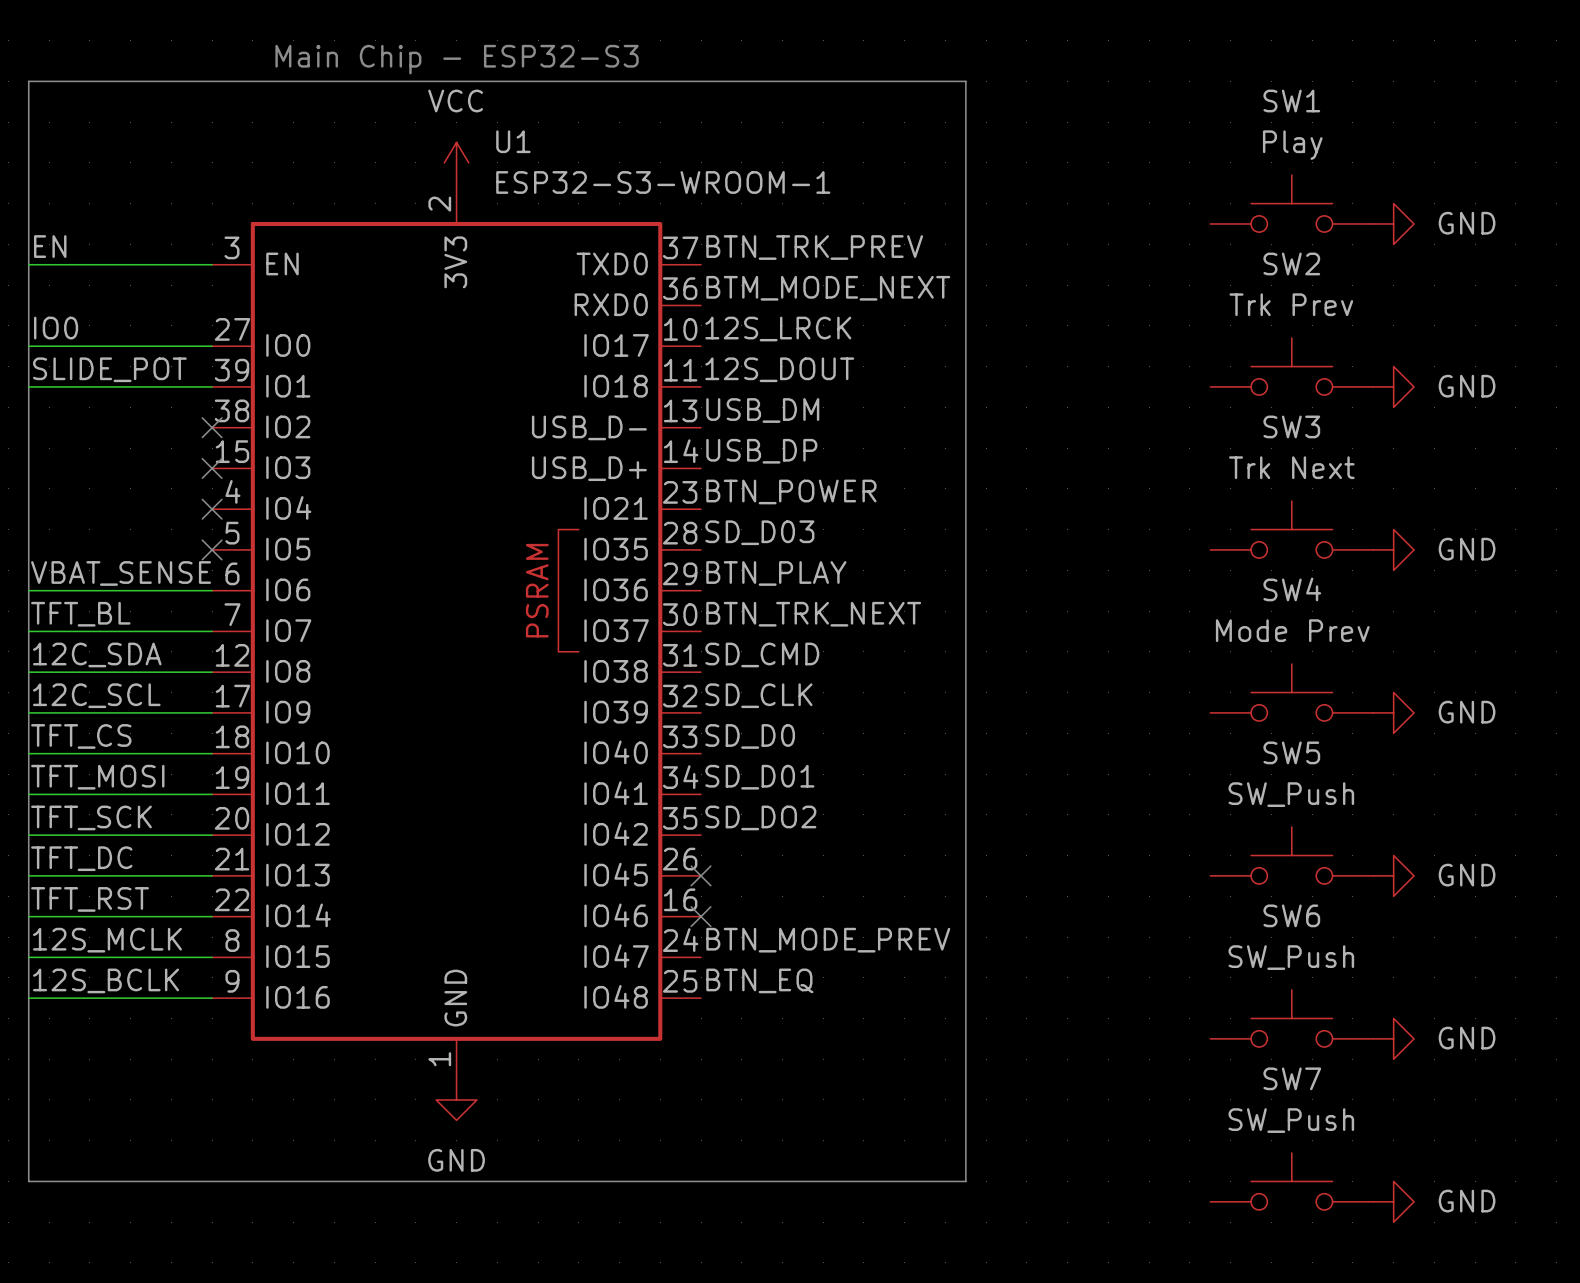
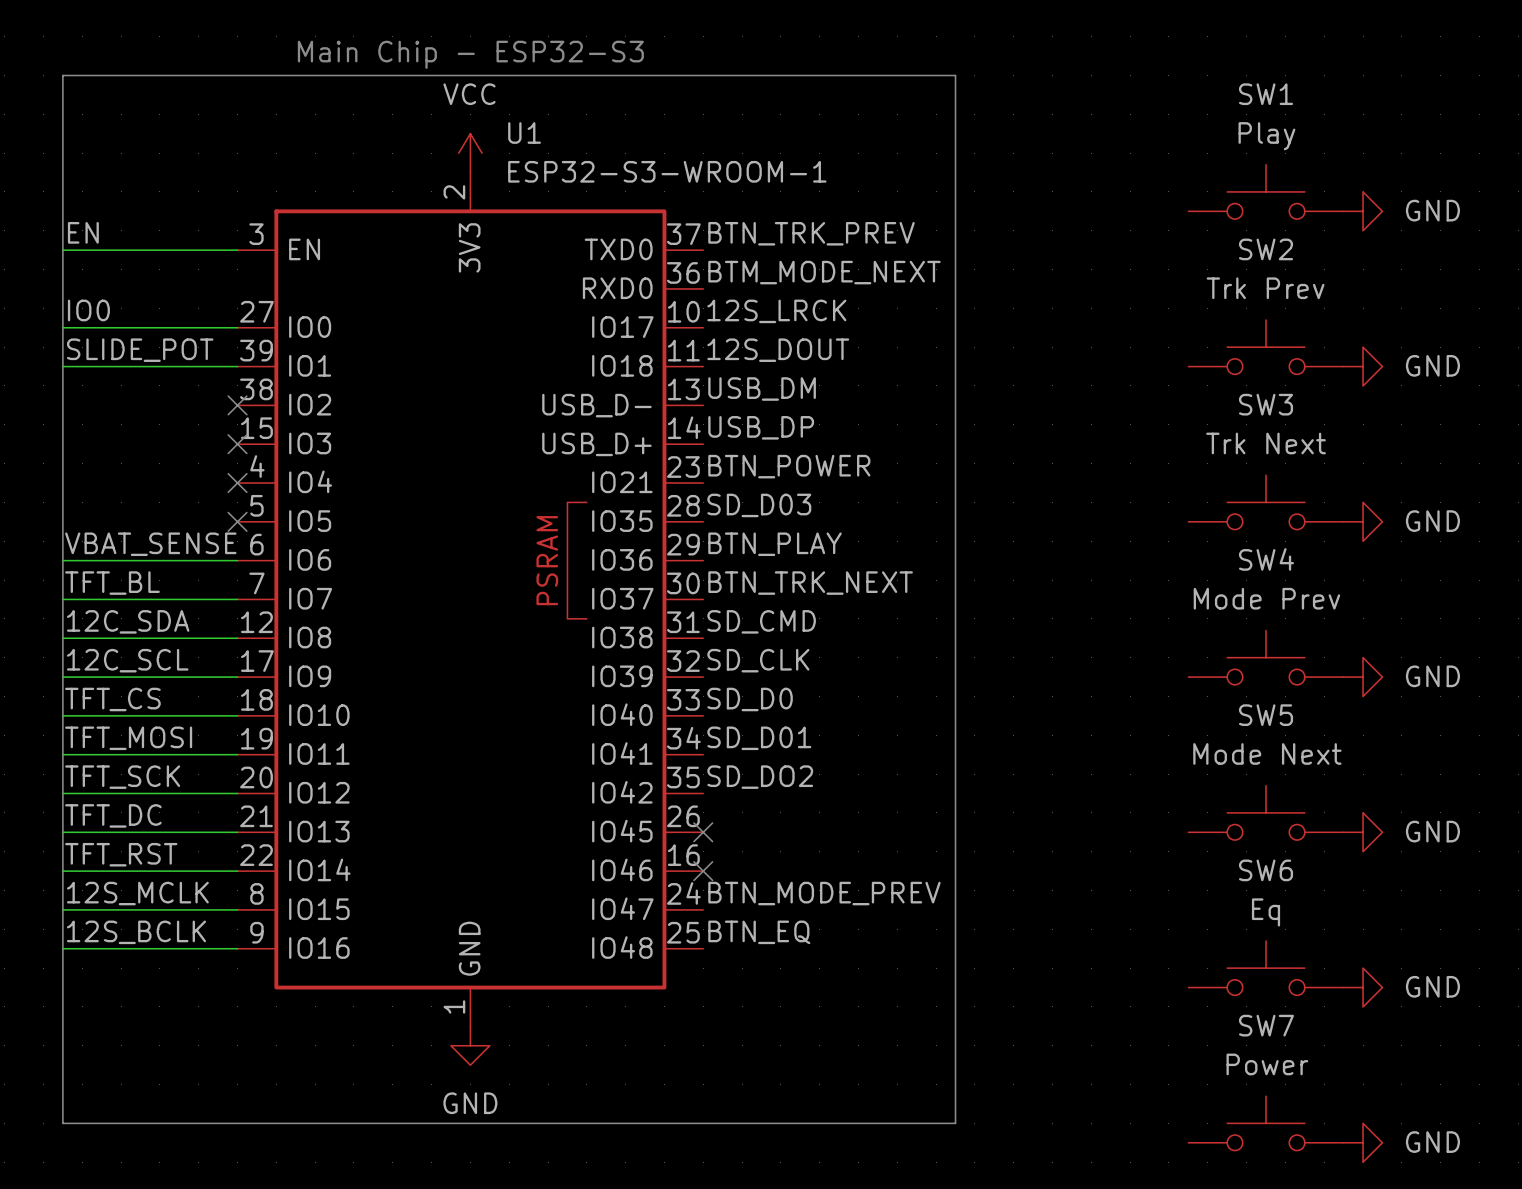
SW5 value: SW_Push (1291, 794) -> Mode Next (1267, 753)
SW6 value: SW_Push (1291, 957) -> Eq (1266, 912)
SW7 value: SW_Push (1291, 1120) -> Power (1267, 1064)

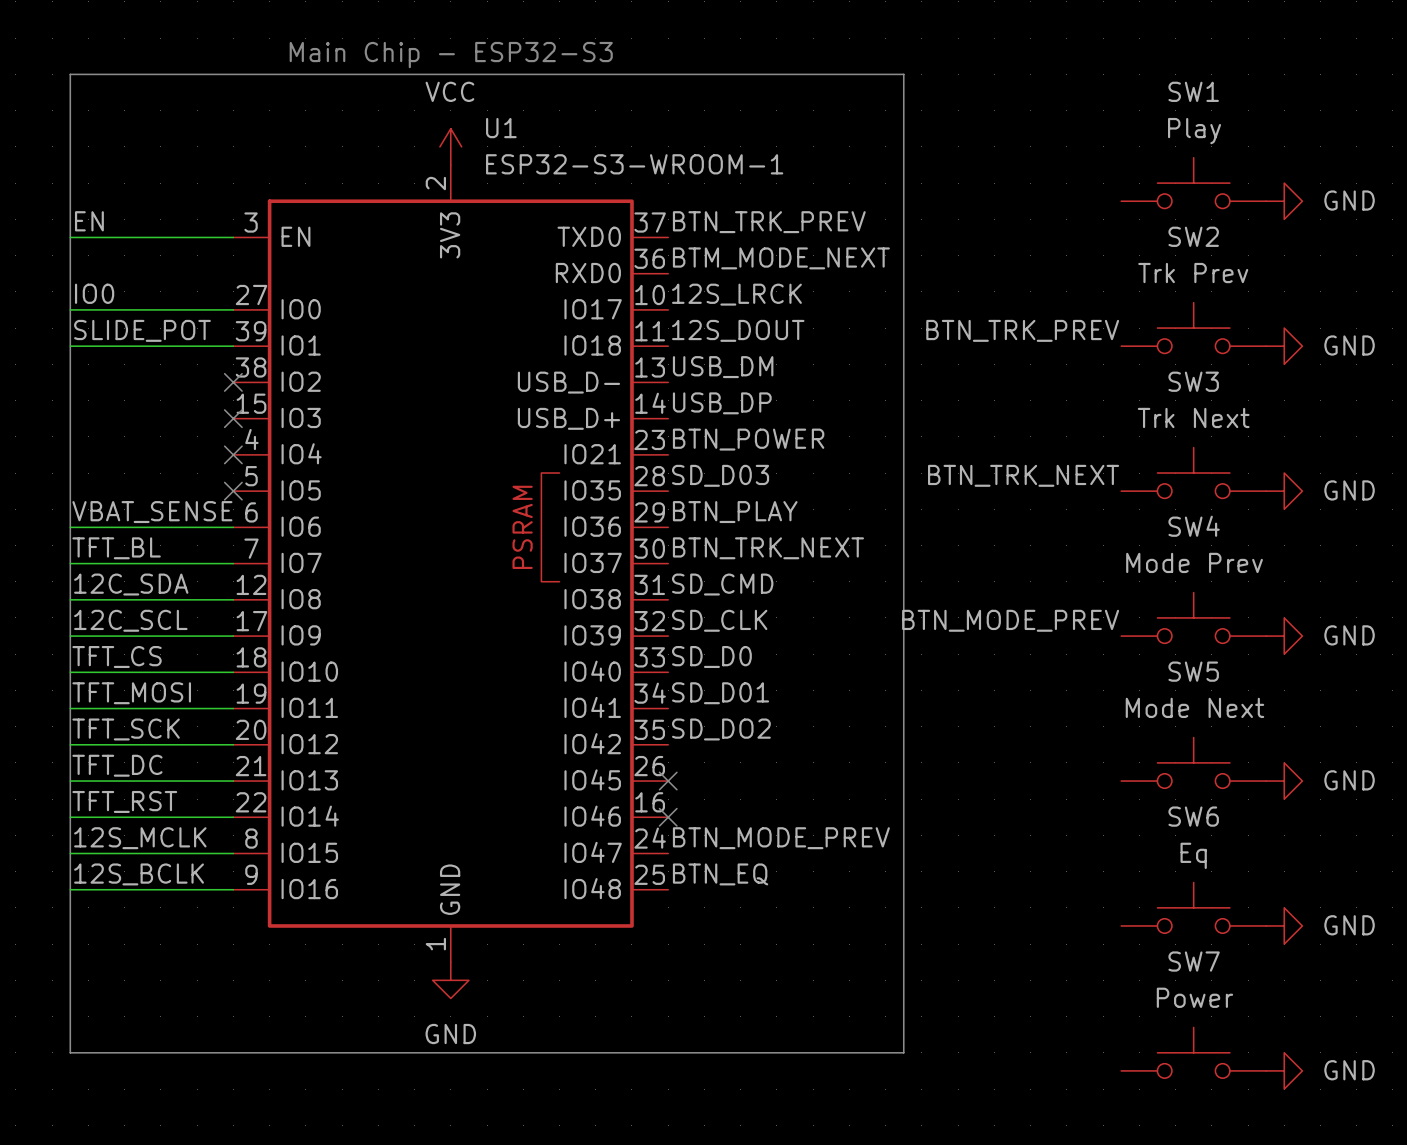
label: none -> BTN_TRK_PREV (1022, 330)
label: none -> BTN_TRK_NEXT (1023, 475)
label: none -> BTN_MODE_PREV (1010, 620)

